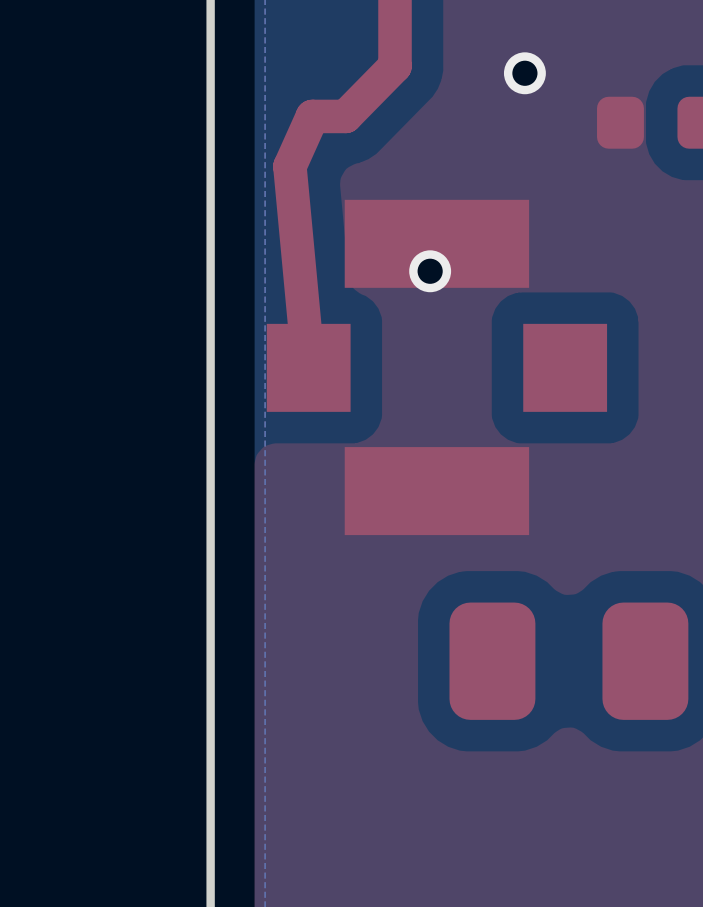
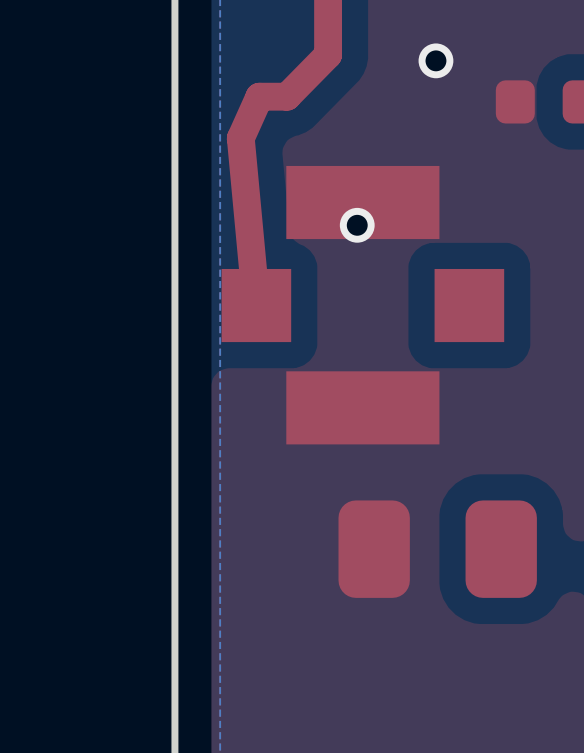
part position: (568, 661) -> (437, 549)

